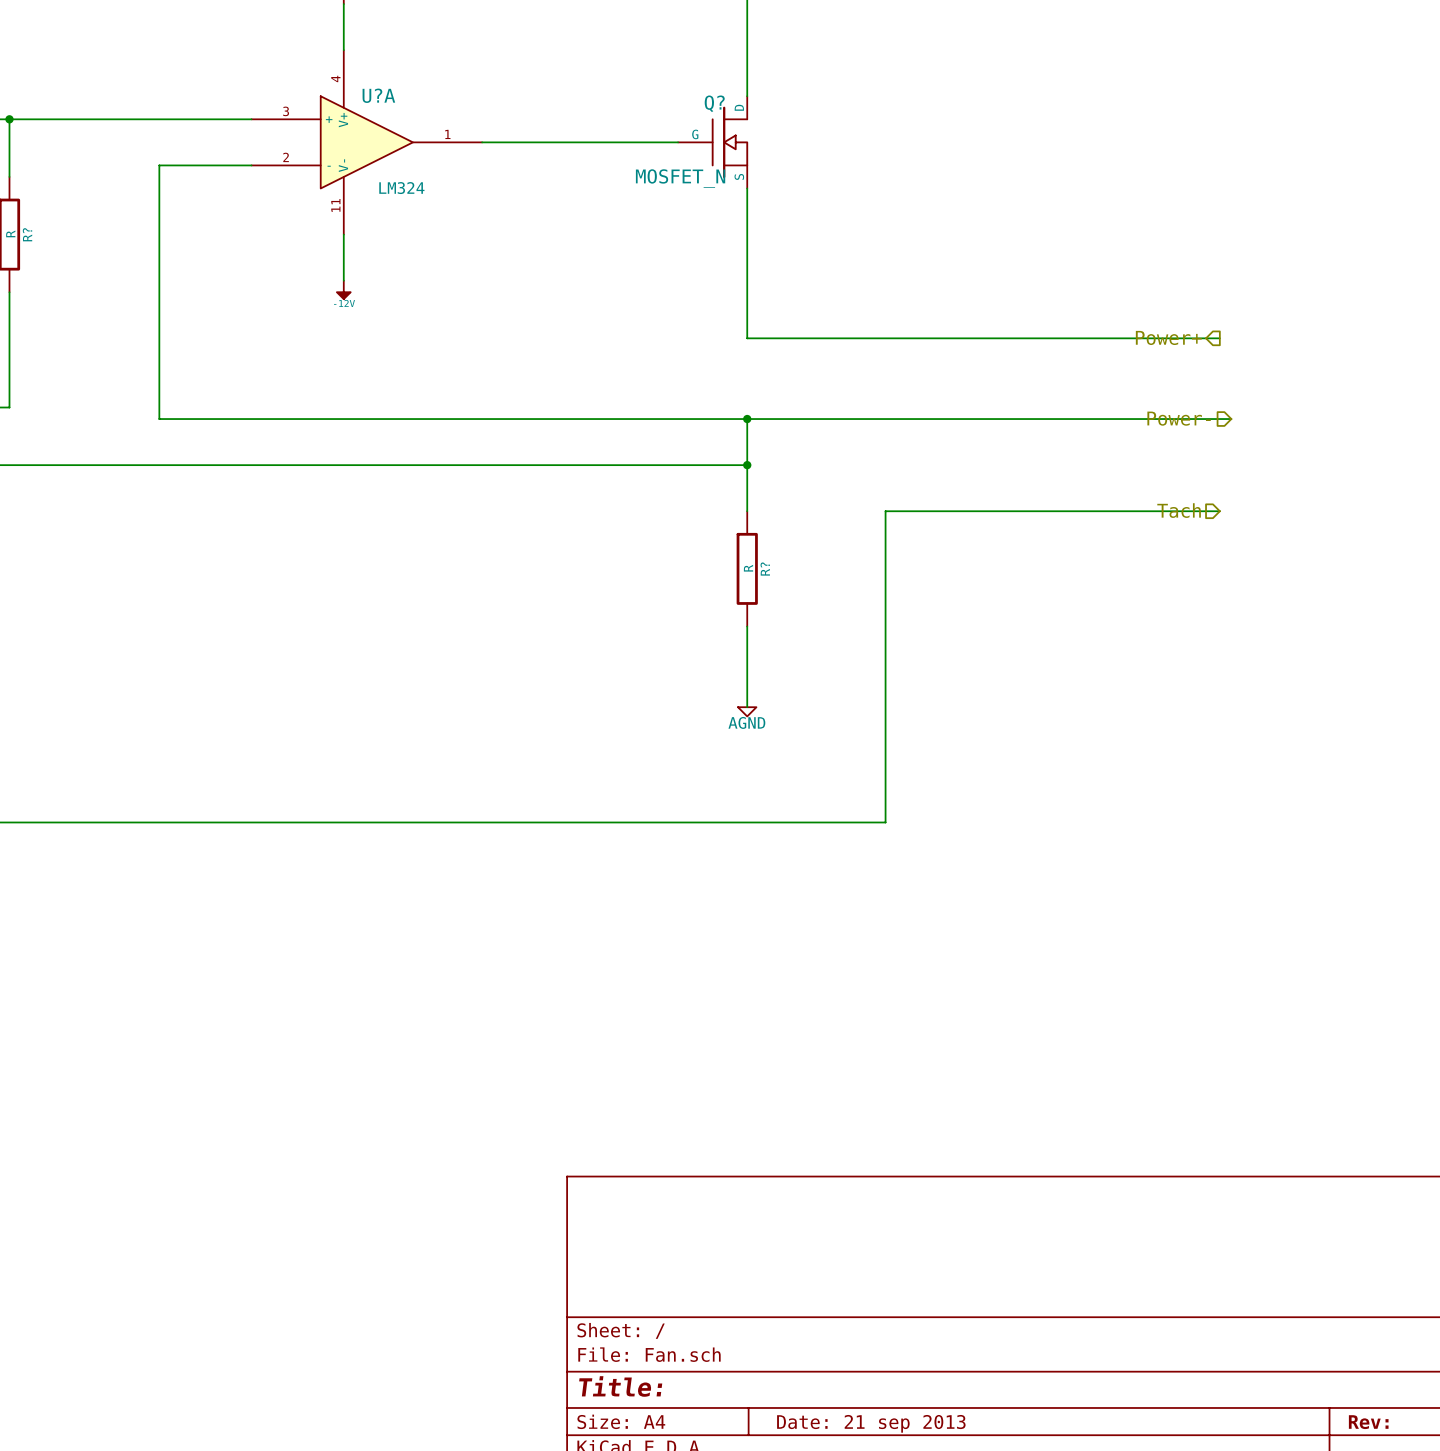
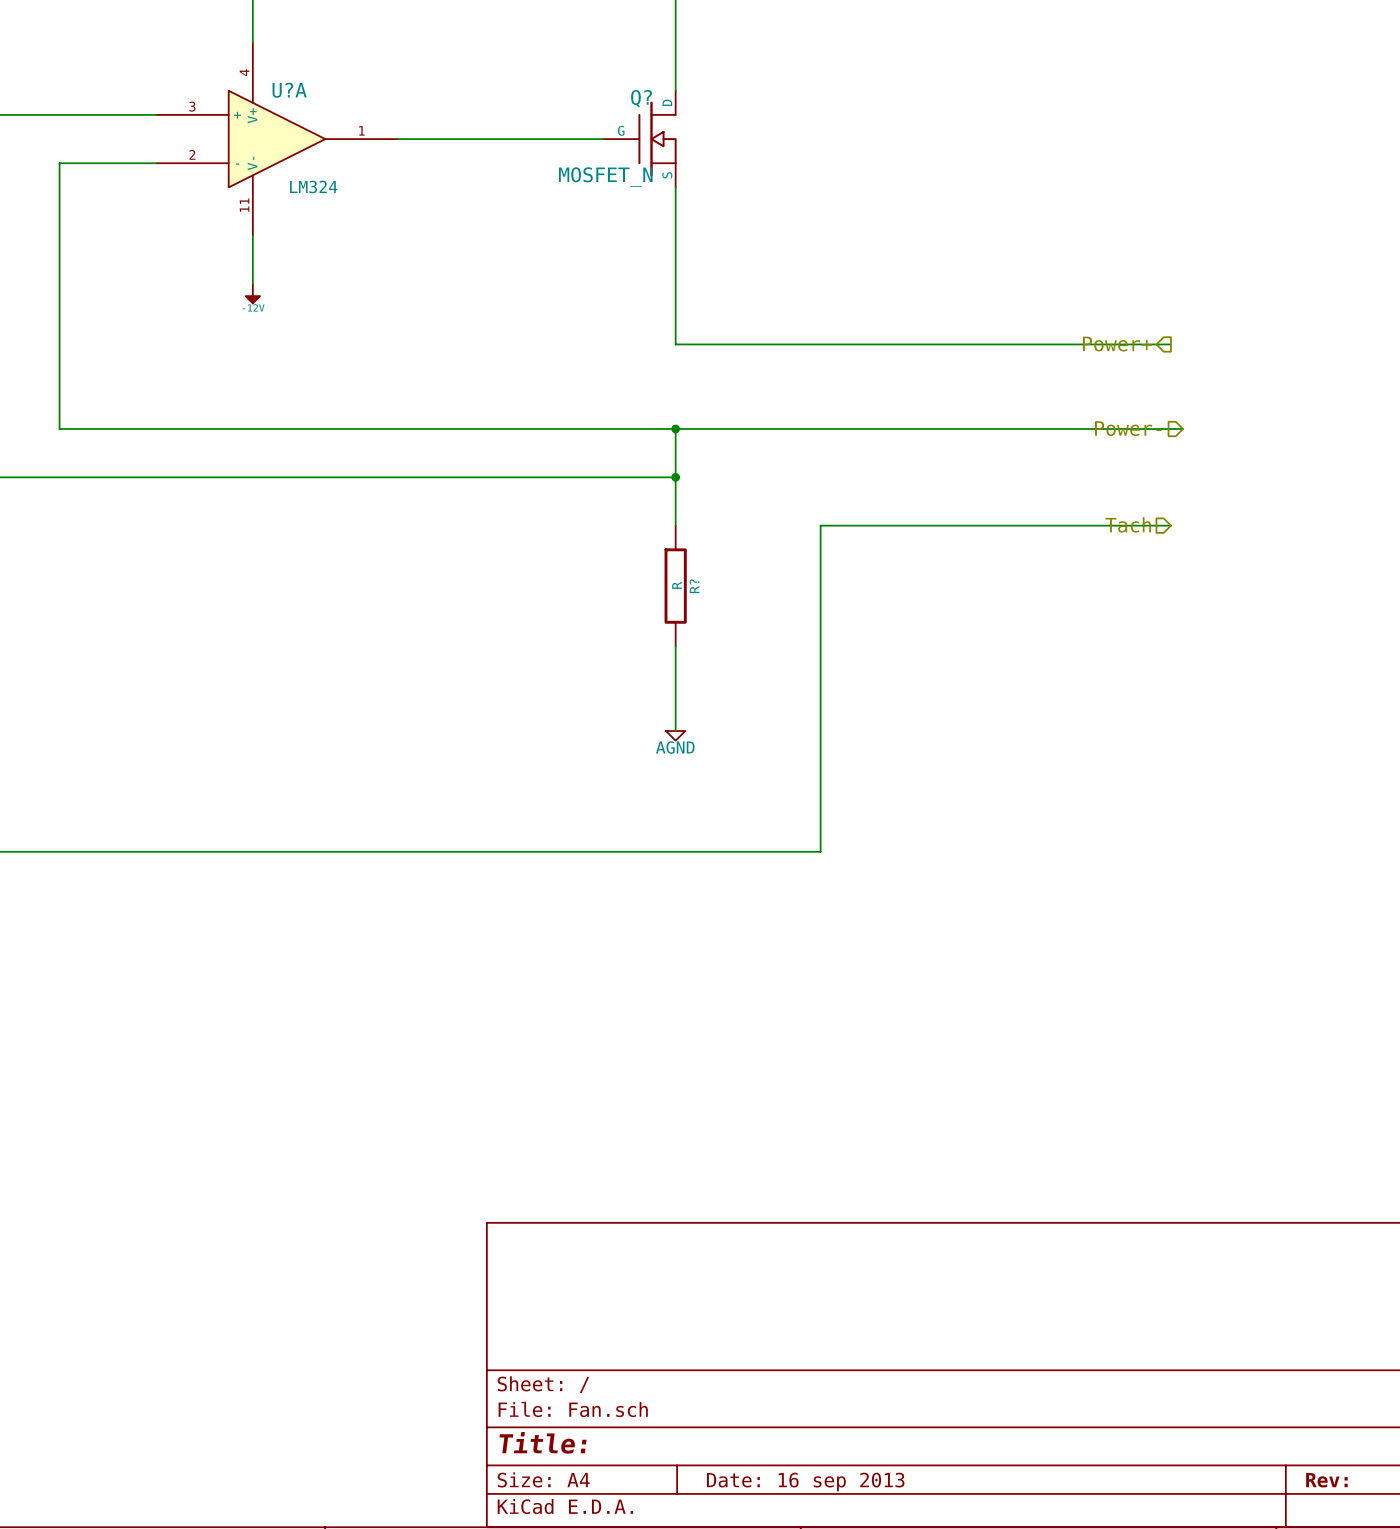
title block: Date: 21 sep 2013 (871, 1423) -> Date: 16 sep 2013 (805, 1481)

